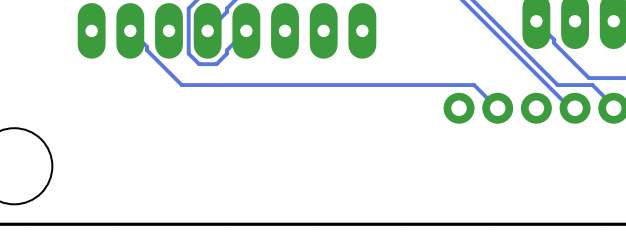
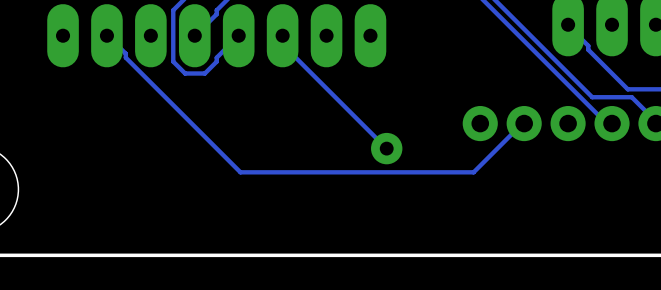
track: none -> (282, 35) (283, 45) (386, 148)
track: (181, 85) (474, 85) (497, 108) -> (165, 97) (240, 172) (473, 172) (524, 123)
via: none -> (386, 148)

